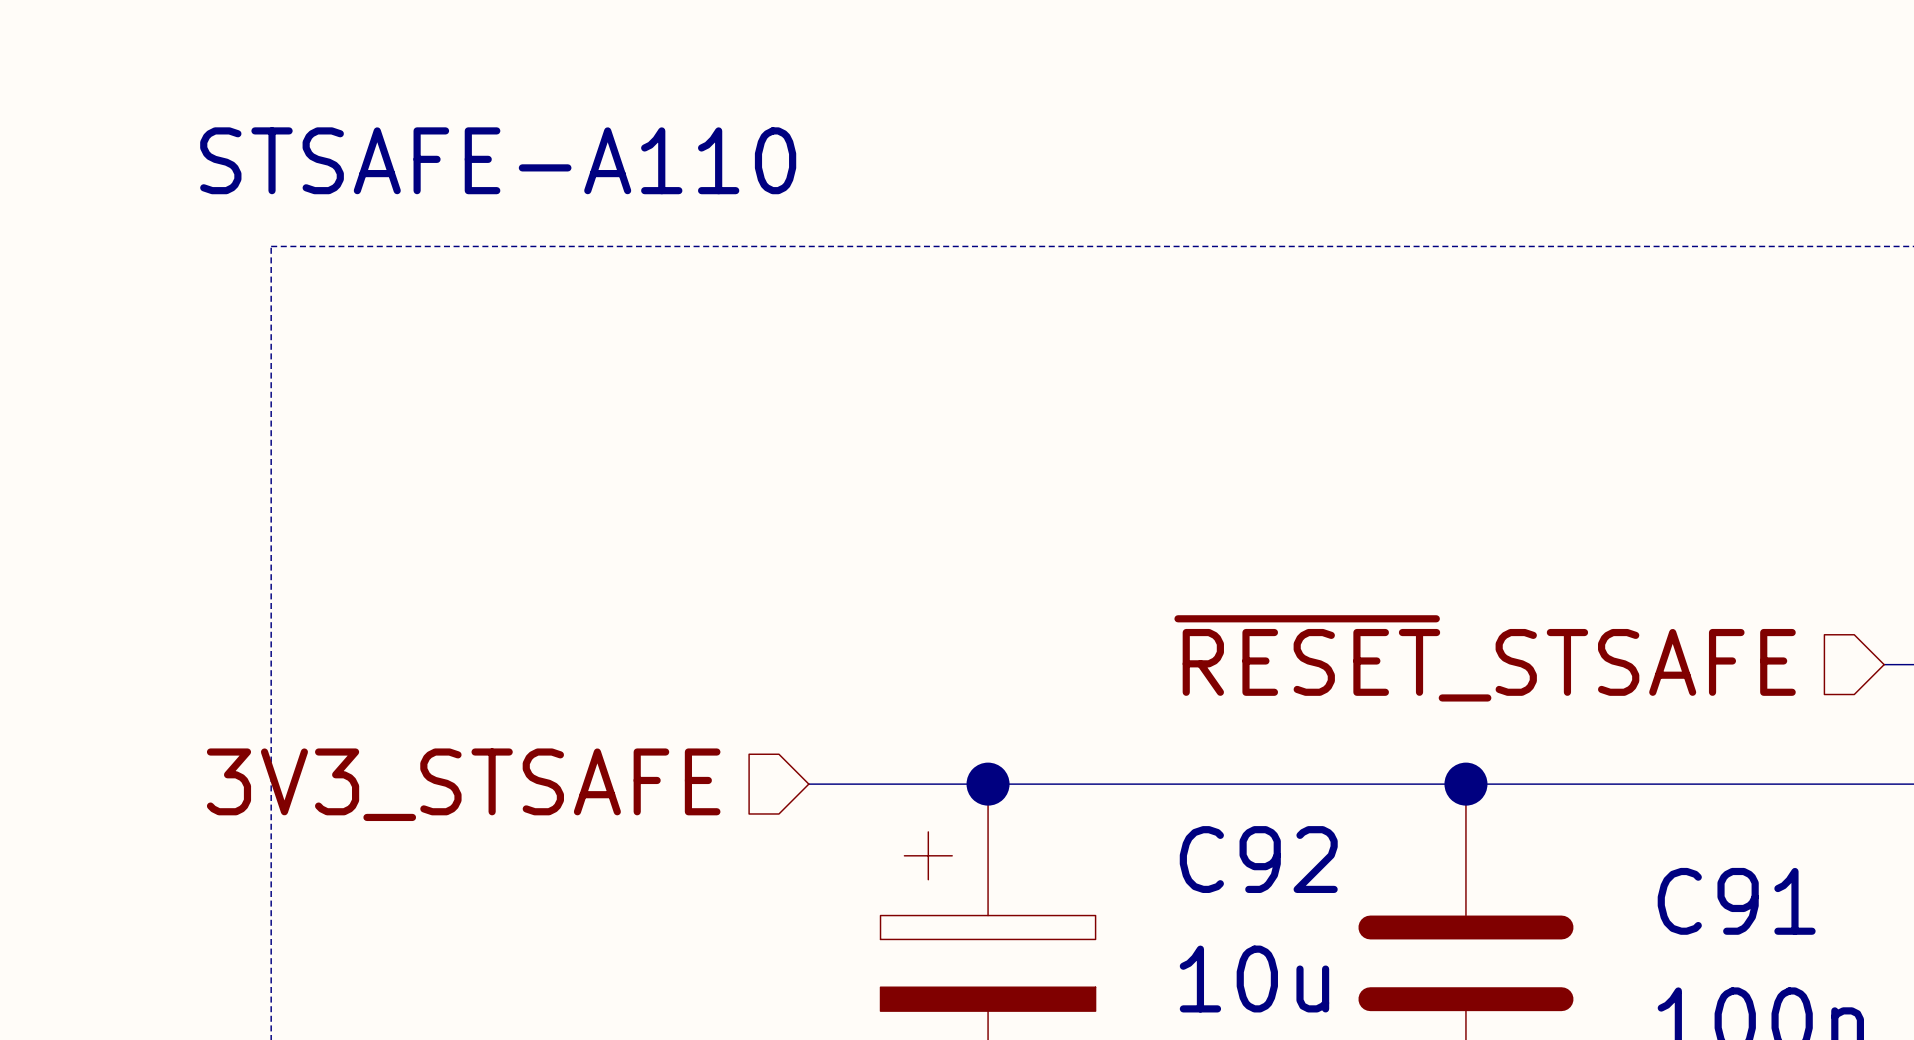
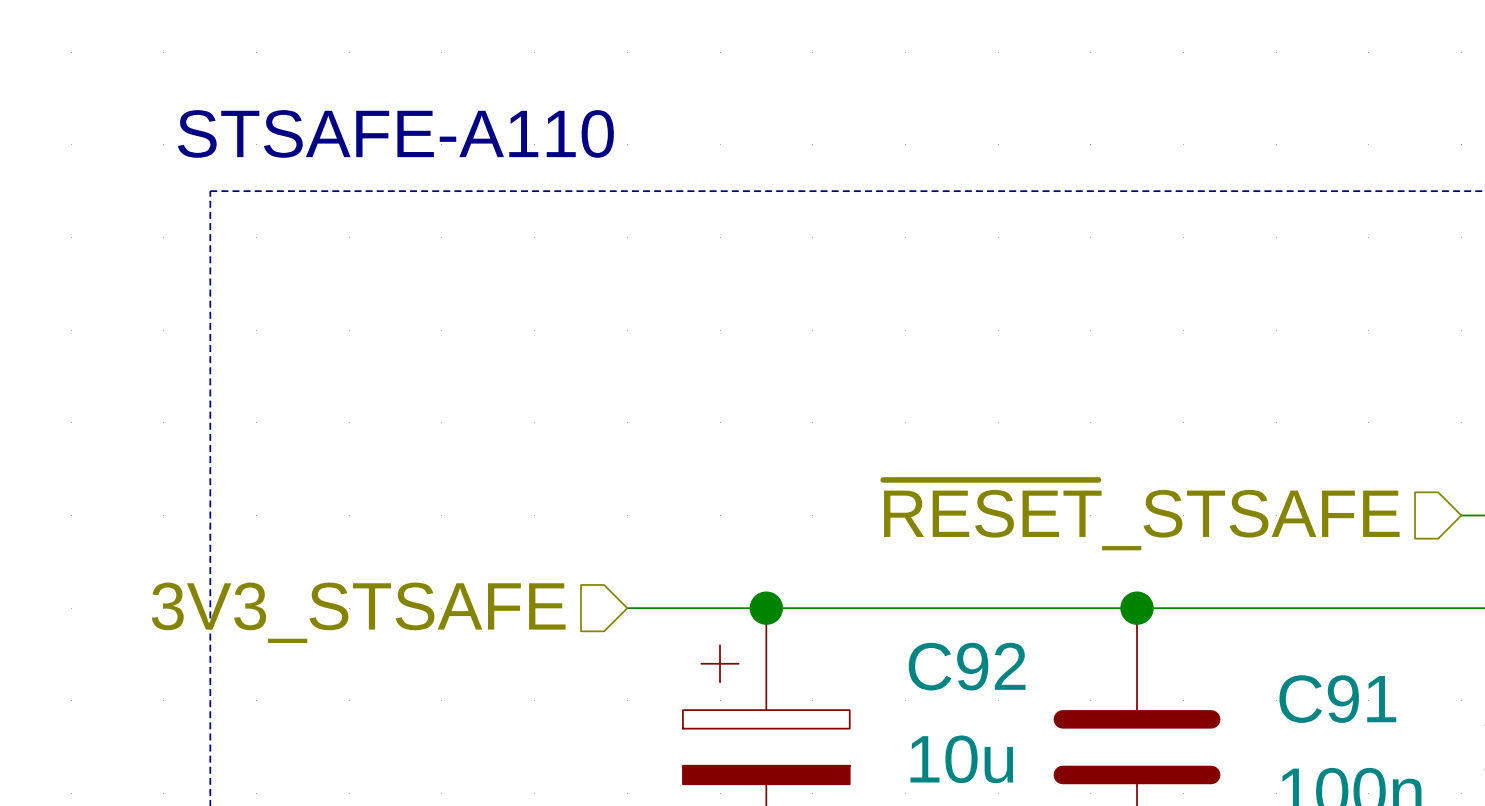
text position: STSAFE-A110 (498, 160) -> STSAFE-A110 (395, 133)

